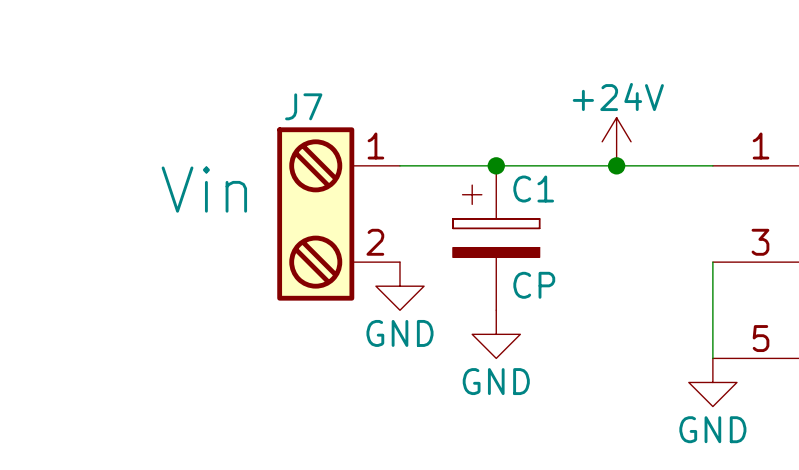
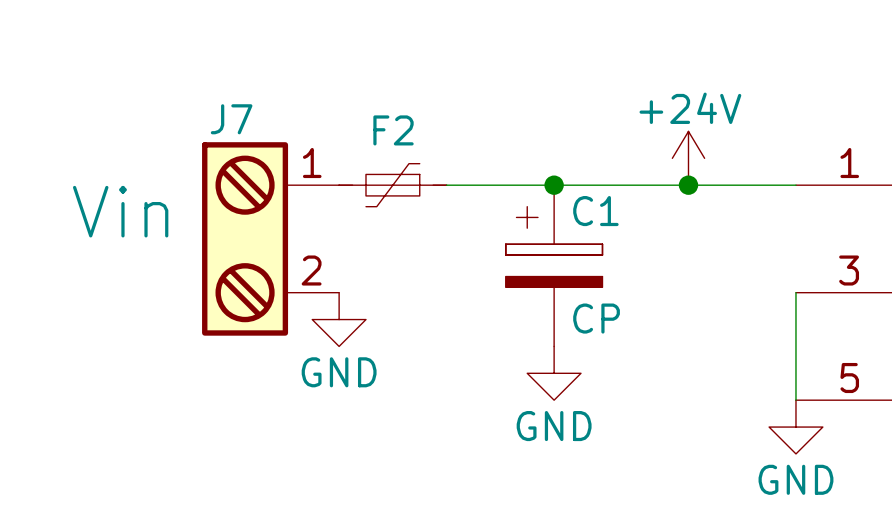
F2: none -> (392, 185)
J7 position: (338, 213) -> (270, 238)
power symbol position: GND (399, 286) -> GND (339, 319)

